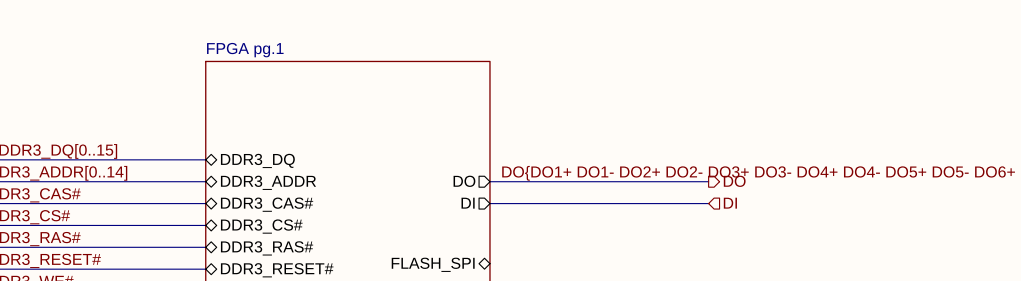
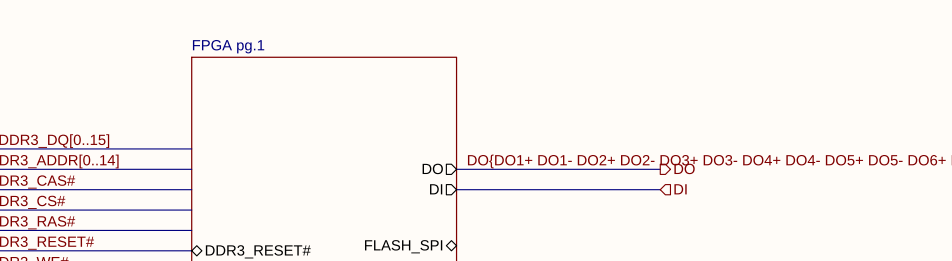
sheet pin: DDR3_DQ (257, 160) -> none
sheet pin: DDR3_ADDR (268, 182) -> none
sheet pin: DDR3_CAS# (267, 204) -> none
sheet pin: DDR3_CS# (261, 226) -> none
sheet pin: DDR3_RAS# (267, 248) -> none

